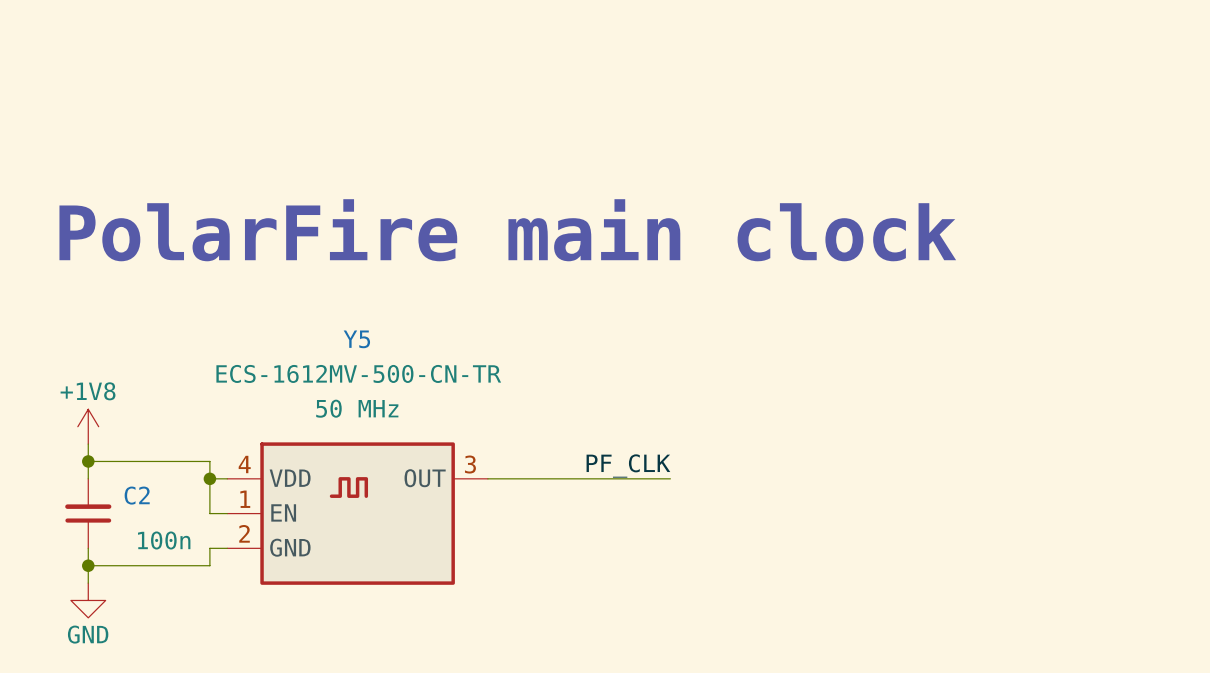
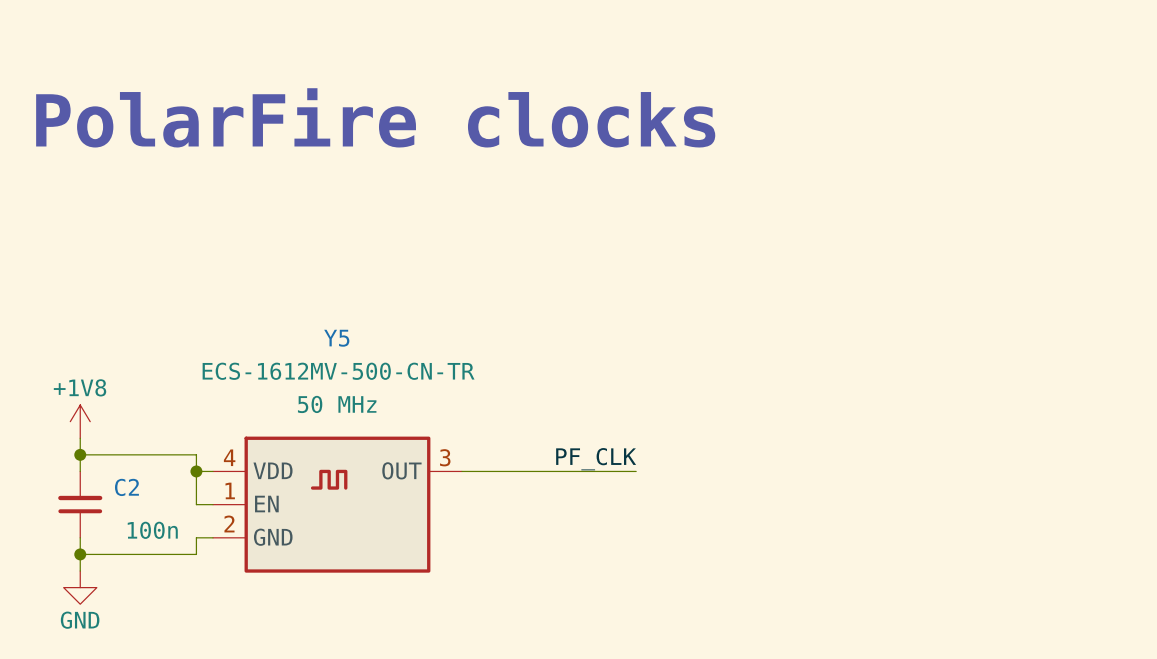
text: none -> PolarFire clocks (375, 117)
text: PolarFire main clock (507, 230) -> none

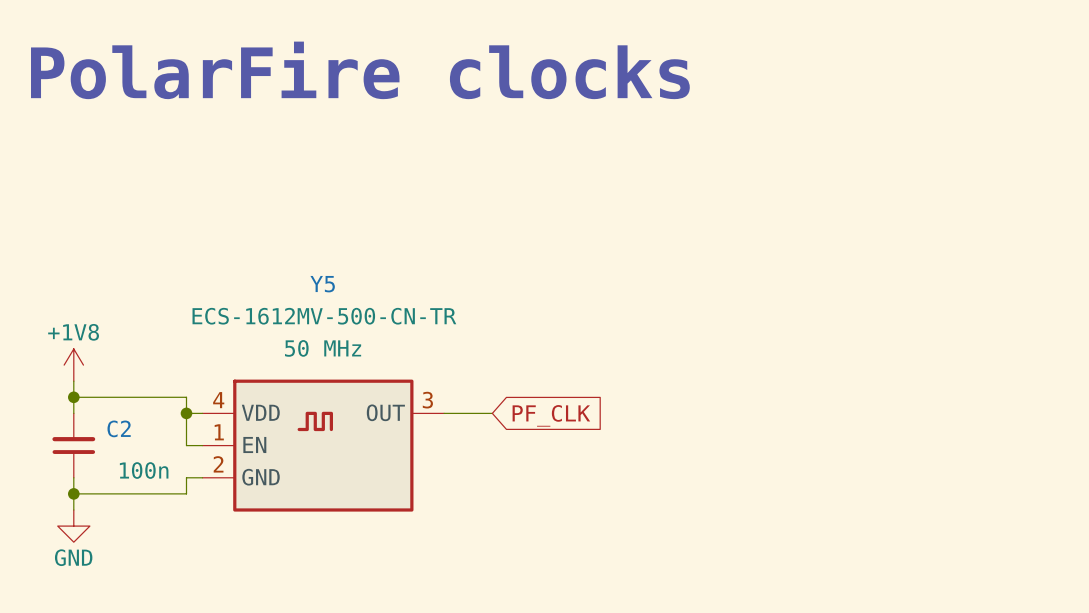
label: PF_CLK (596, 459) -> none
wire: (511, 471) (636, 471) -> none
global label: none -> PF_CLK (551, 415)

